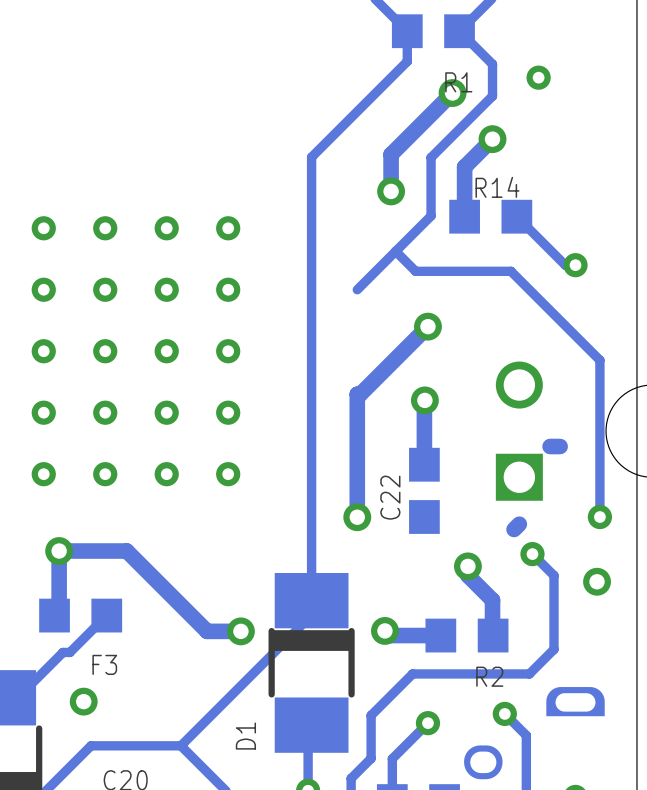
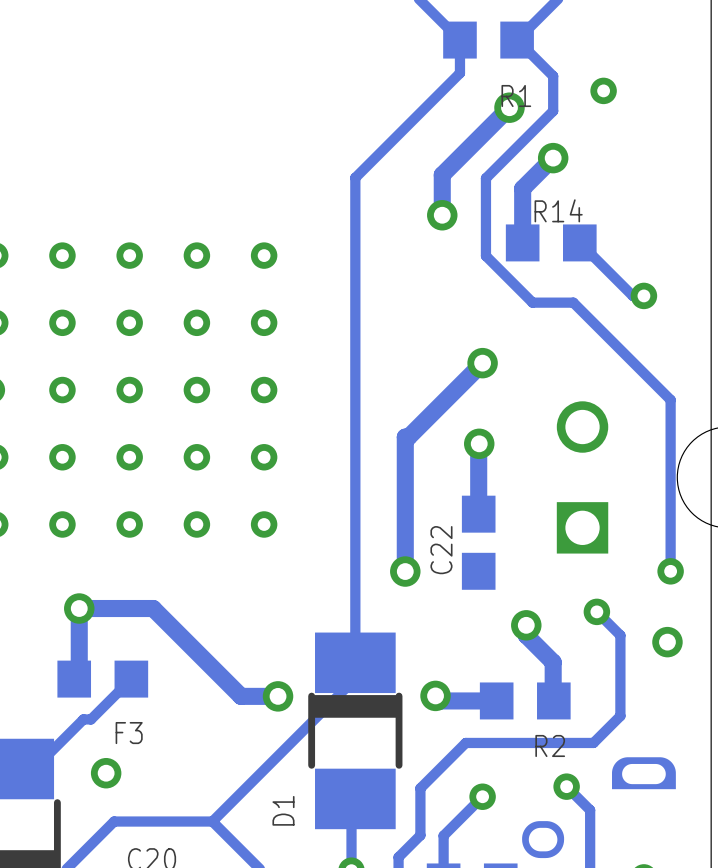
track: (431, 215) (357, 289) -> none
track: (395, 251) (415, 271) (473, 271) -> (485, 242) (485, 256) (532, 302)
track: (560, 446) (550, 446) -> none
track: (519, 524) (514, 529) -> none

